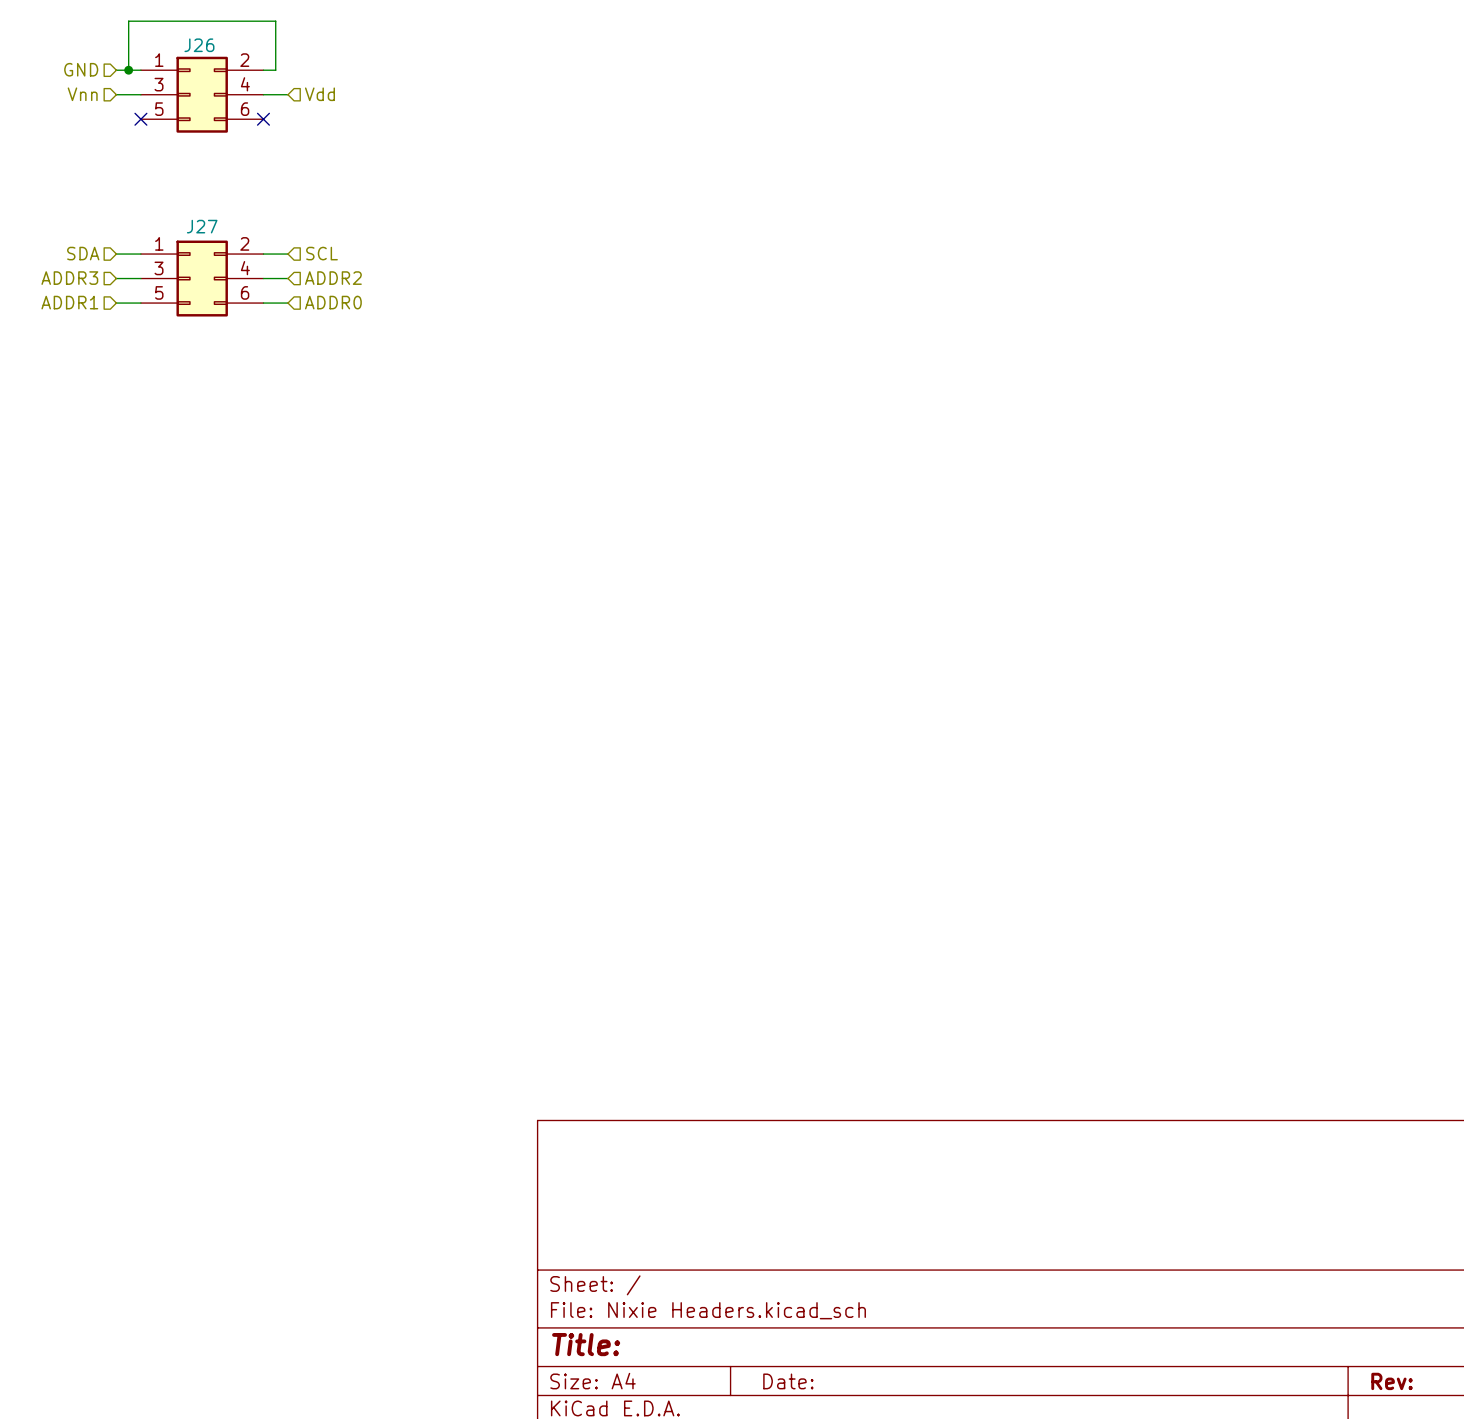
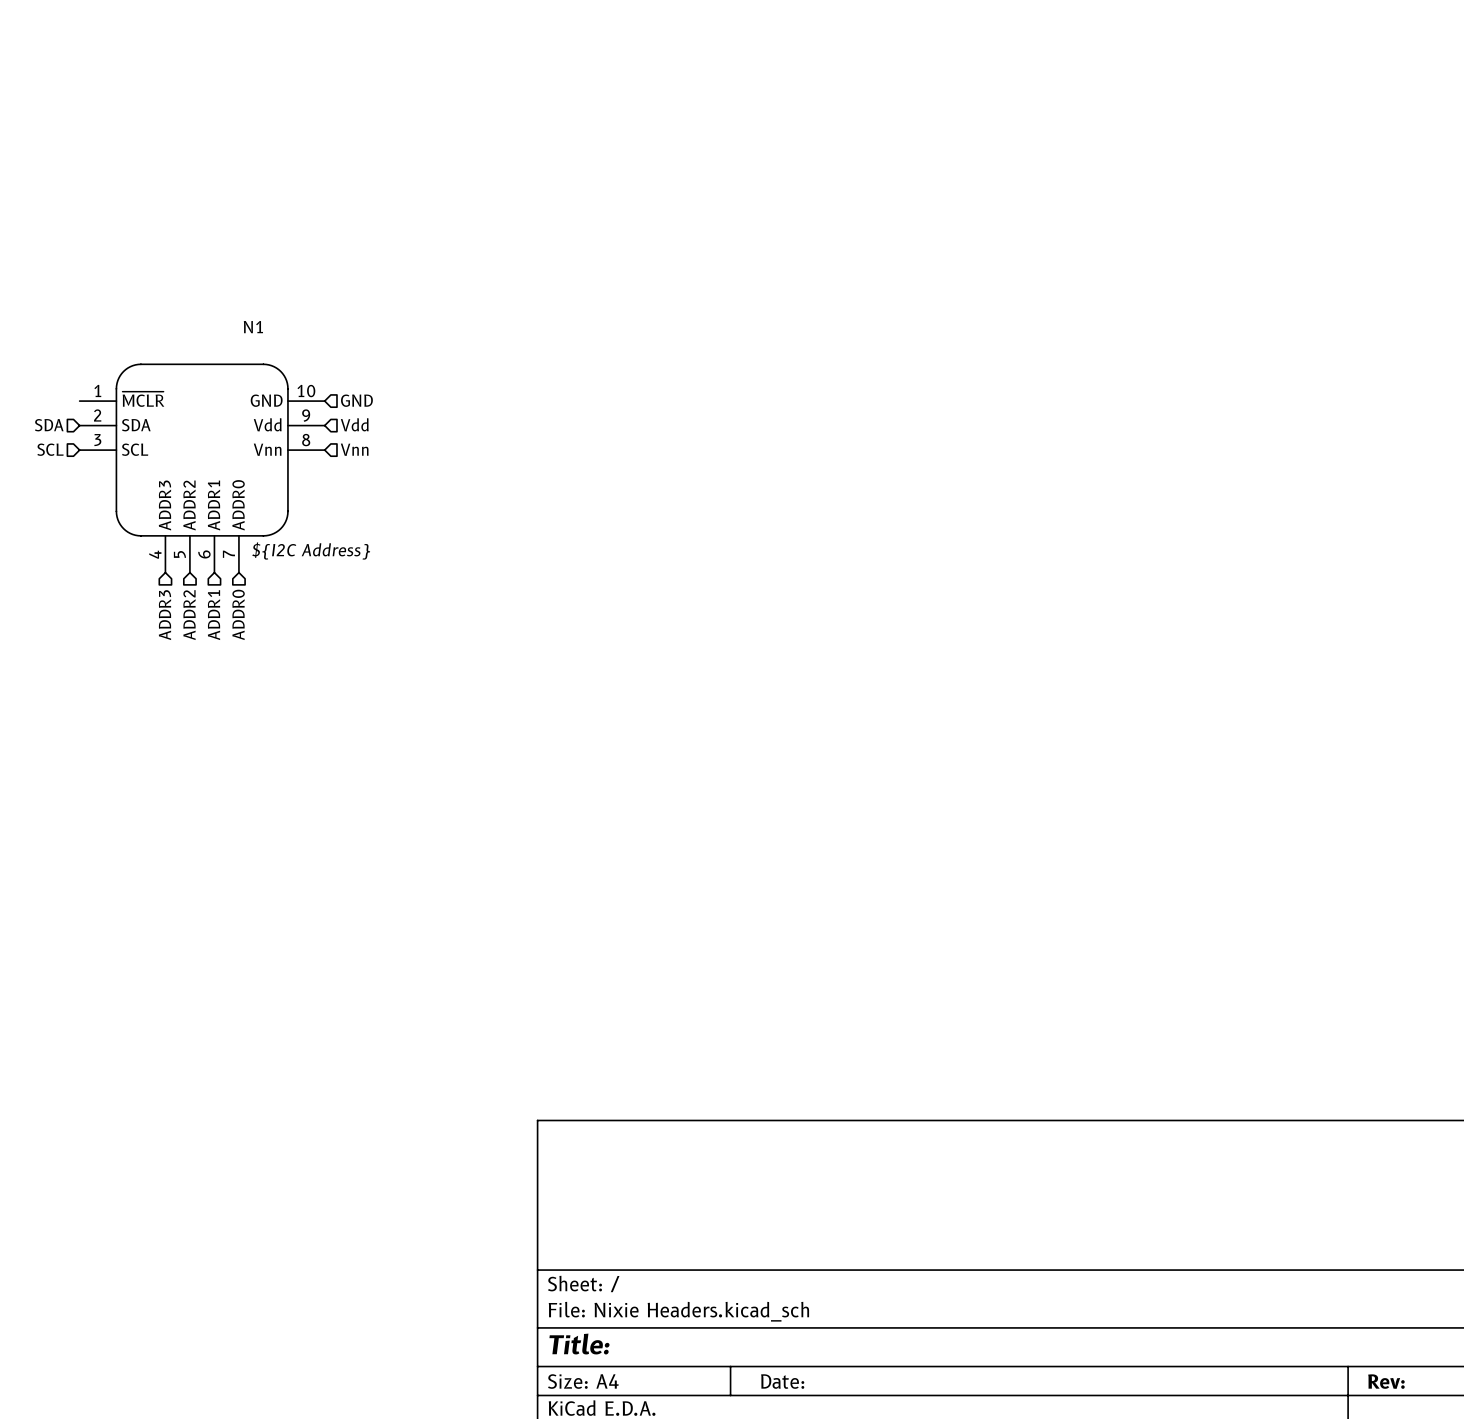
hierarchical label: GND (81, 69) -> none
wire: (116, 70) (140, 70) -> none
wire: (128, 70) (128, 21) (275, 21) (275, 70) (263, 70) -> none
junction: (128, 70) -> none
hierarchical label: Vnn (82, 94) -> none
wire: (116, 94) (140, 94) -> none
J26: (202, 94) -> none
wire: (263, 94) (287, 94) -> none
hierarchical label: Vdd (319, 94) -> none
no-connect mark: (140, 119) -> none
no-connect mark: (263, 119) -> none
hierarchical label position: SDA (83, 253) -> SDA (49, 425)
hierarchical label: SCL (322, 253) -> none
wire: (116, 254) (140, 254) -> none
wire: (263, 254) (287, 254) -> none
hierarchical label: ADDR3 (69, 278) -> none
wire: (116, 278) (140, 278) -> none
J27: (202, 278) -> none
wire: (263, 278) (287, 278) -> none
hierarchical label: ADDR2 (333, 278) -> none
hierarchical label: ADDR1 (69, 302) -> none
hierarchical label: ADDR0 (333, 302) -> none
wire: (116, 303) (140, 303) -> none
wire: (263, 303) (287, 303) -> none
hierarchical label: none -> GND (356, 400)
hierarchical label: none -> Vdd (354, 424)
hierarchical label: none -> SCL (50, 449)
hierarchical label: none -> Vnn (354, 449)
N1: none -> (202, 468)
hierarchical label: none -> ADDR3 (164, 615)
hierarchical label: none -> ADDR2 (189, 615)
hierarchical label: none -> ADDR1 (213, 615)
hierarchical label: none -> ADDR0 (238, 614)

